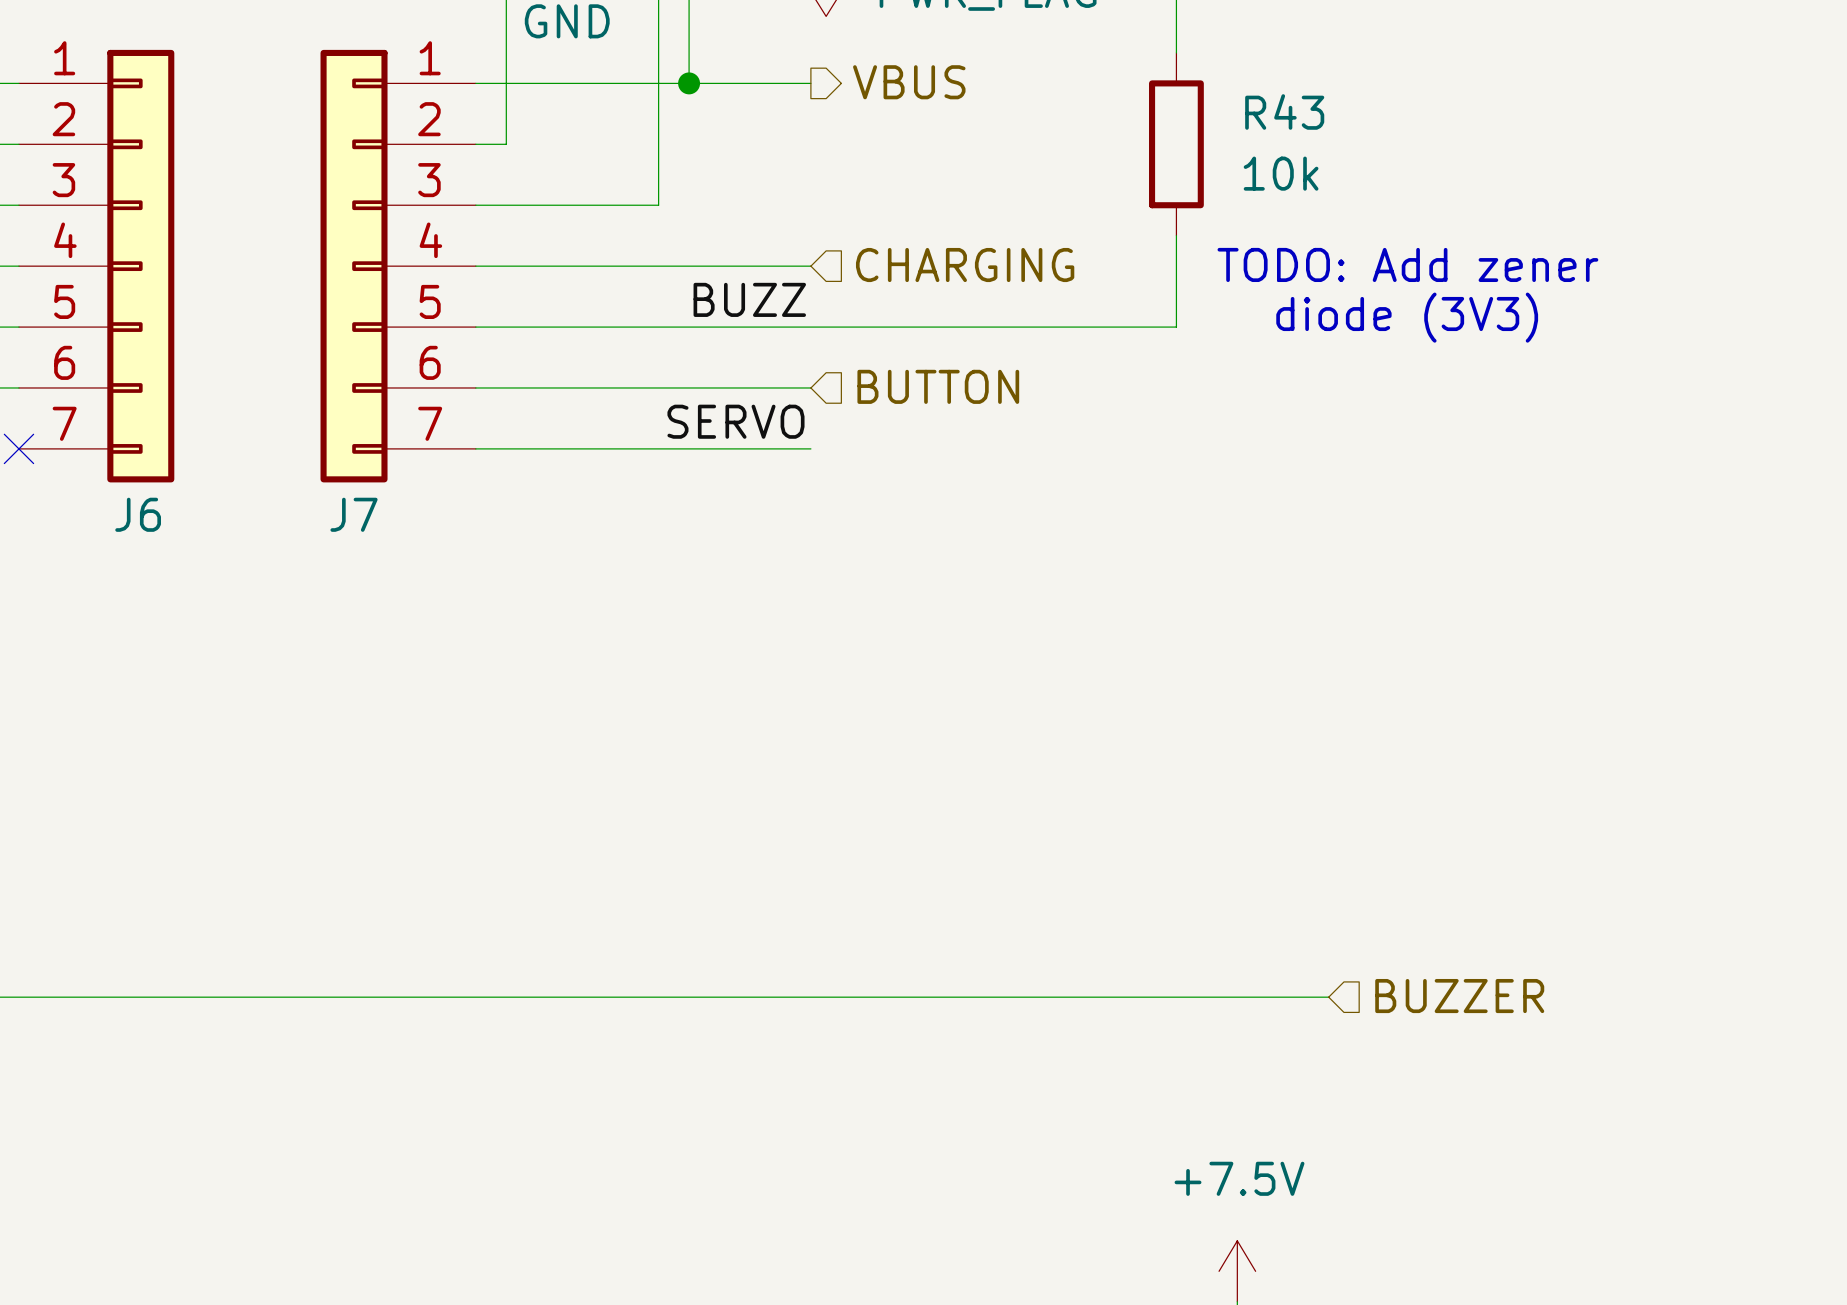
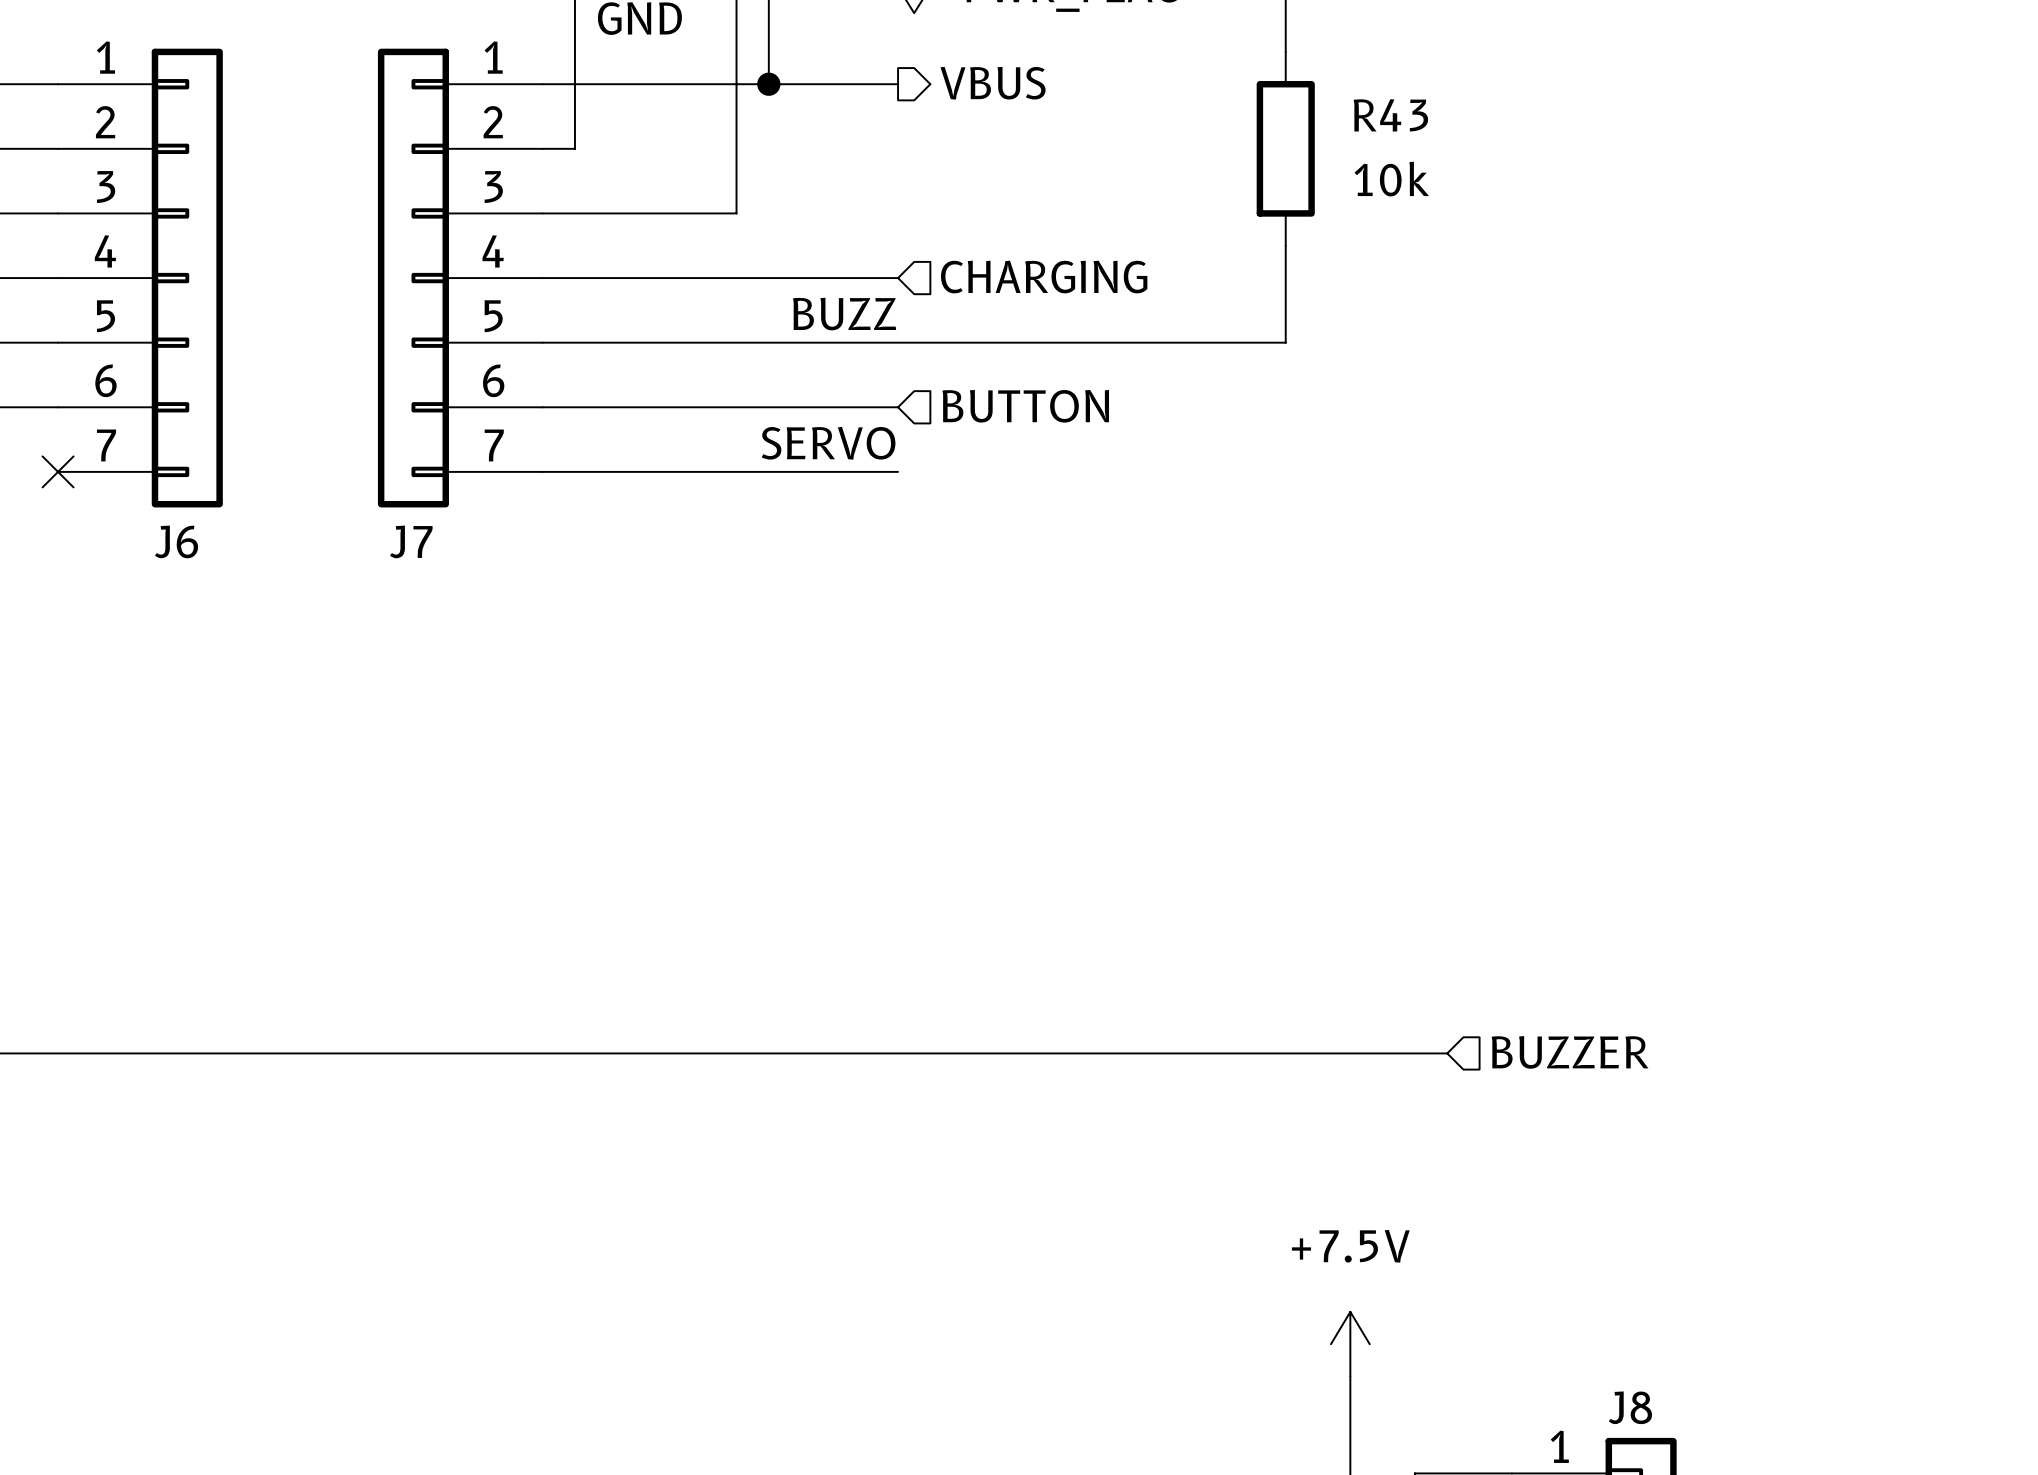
text: TODO: Add zener (1407, 264) -> none
text: diode (3V3) (1407, 317) -> none

